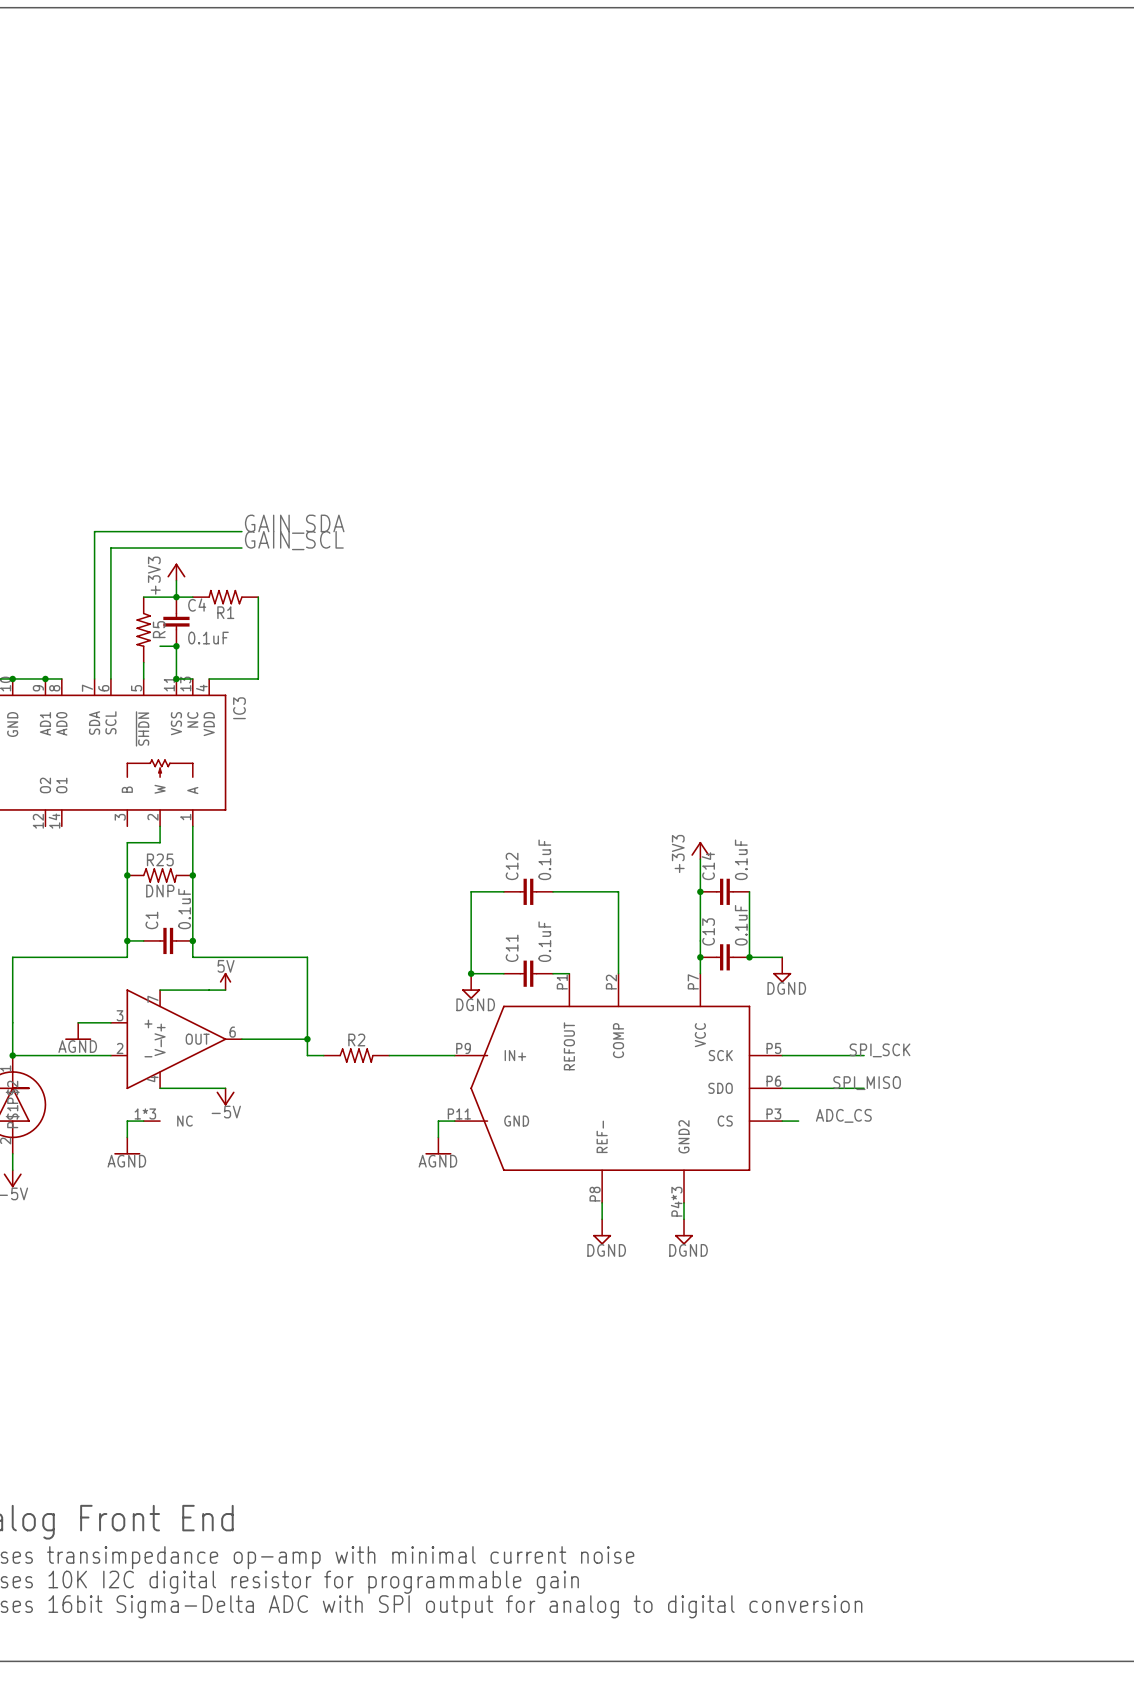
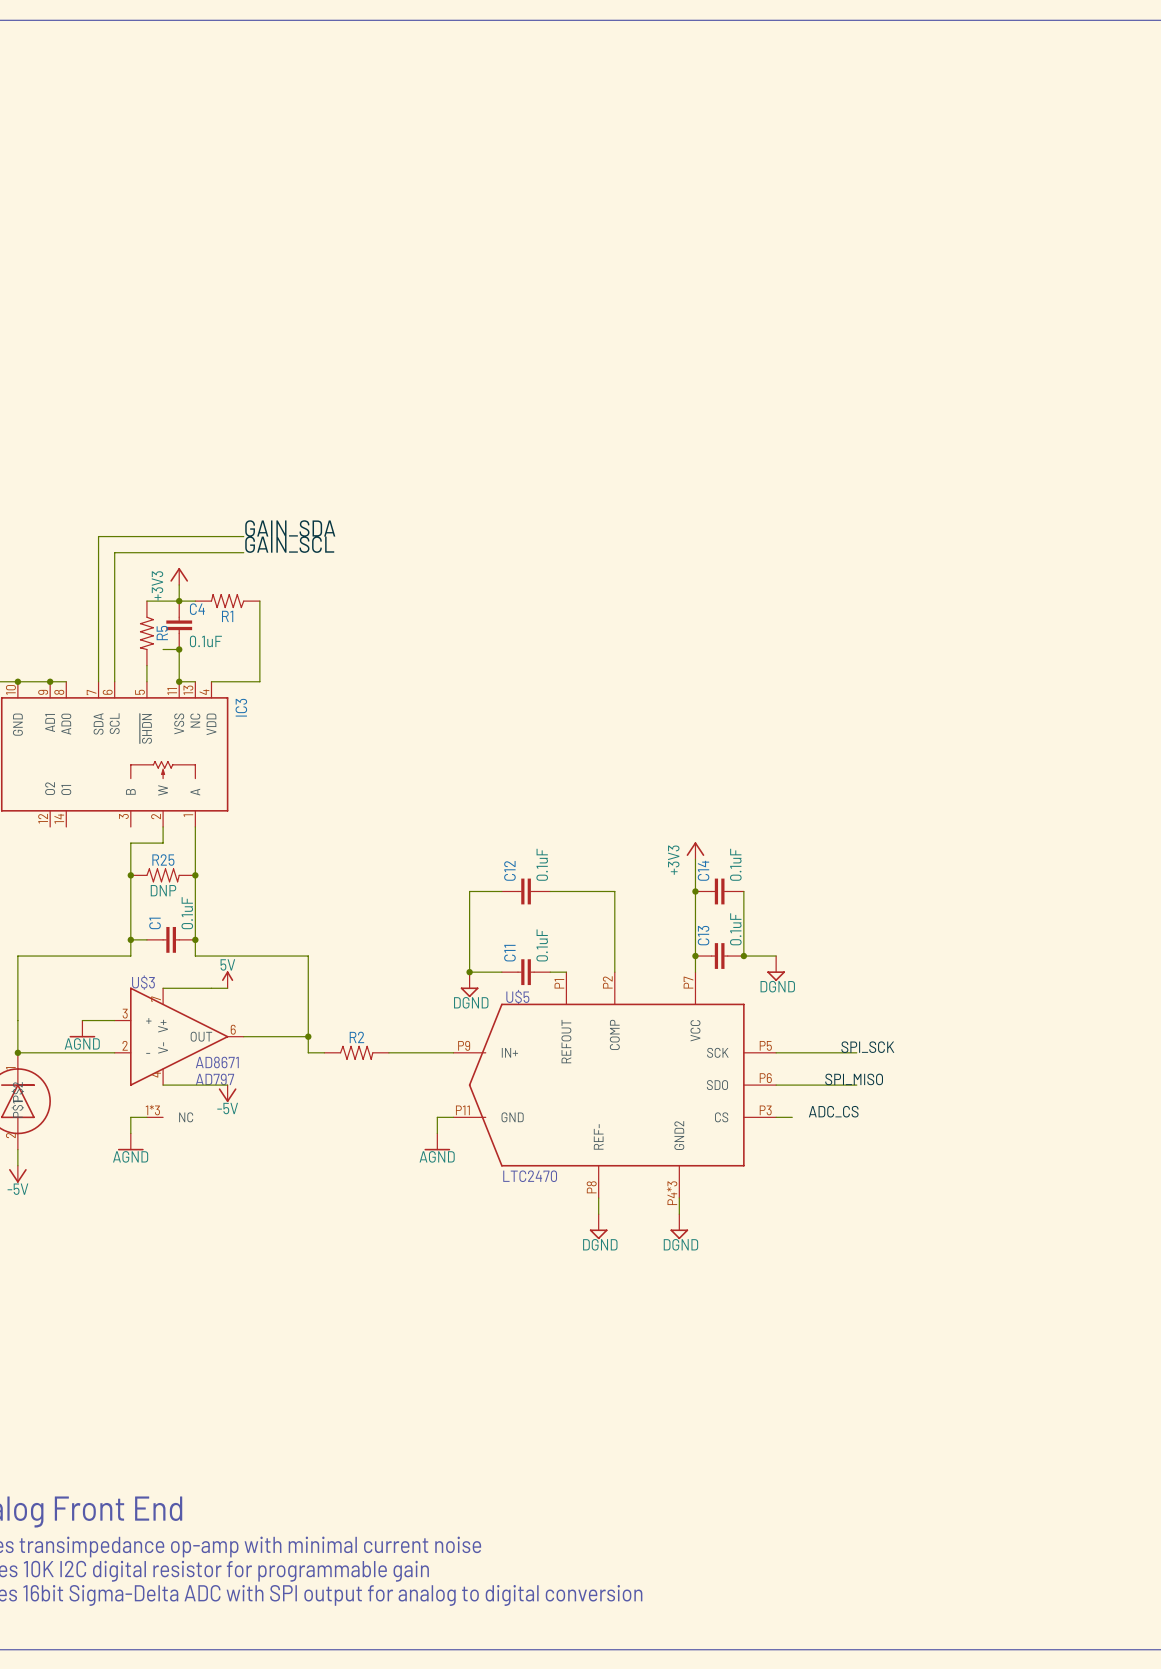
text: none -> U$3 (143, 982)
text: none -> U$5 (517, 997)
text: none -> AD8671 (217, 1062)
text: none -> AD797 (214, 1079)
text: none -> LTC2470 (530, 1176)

